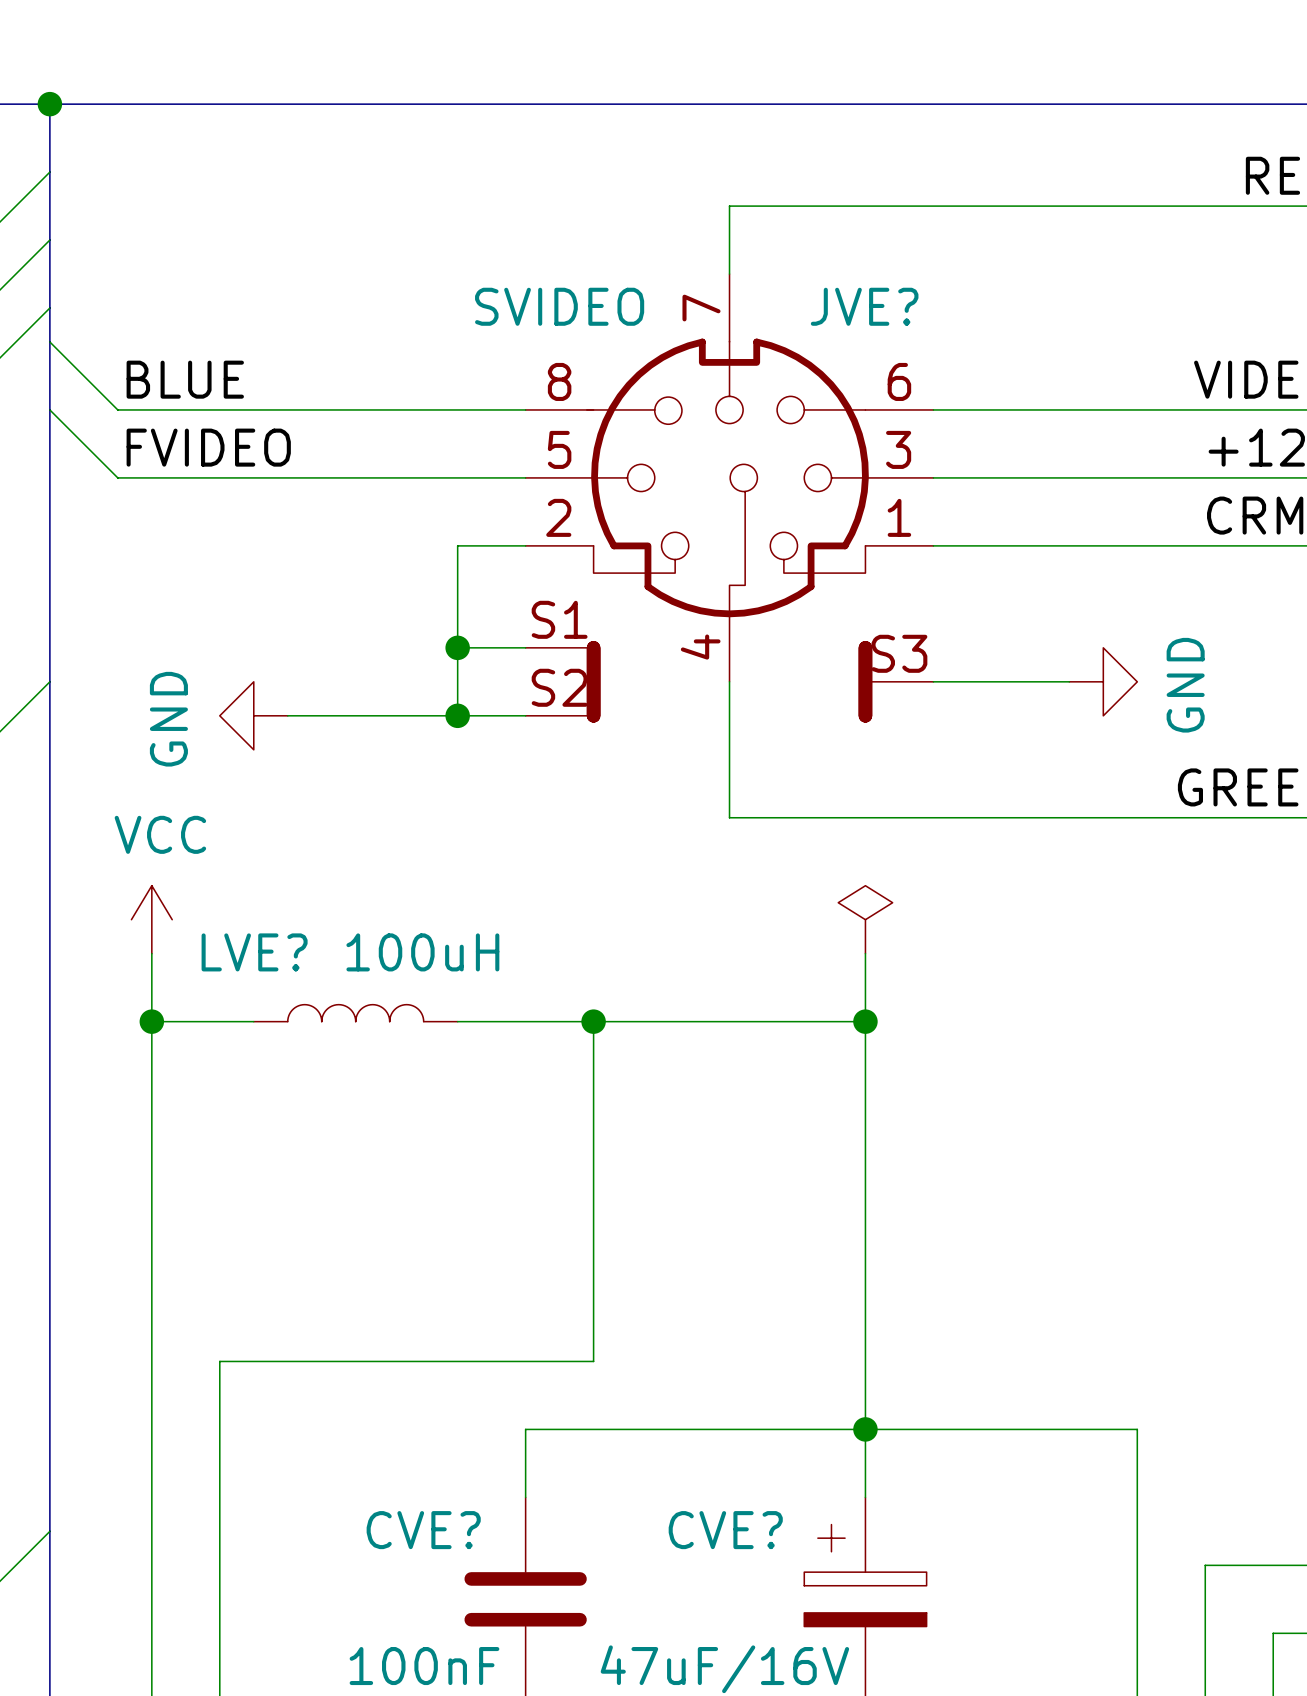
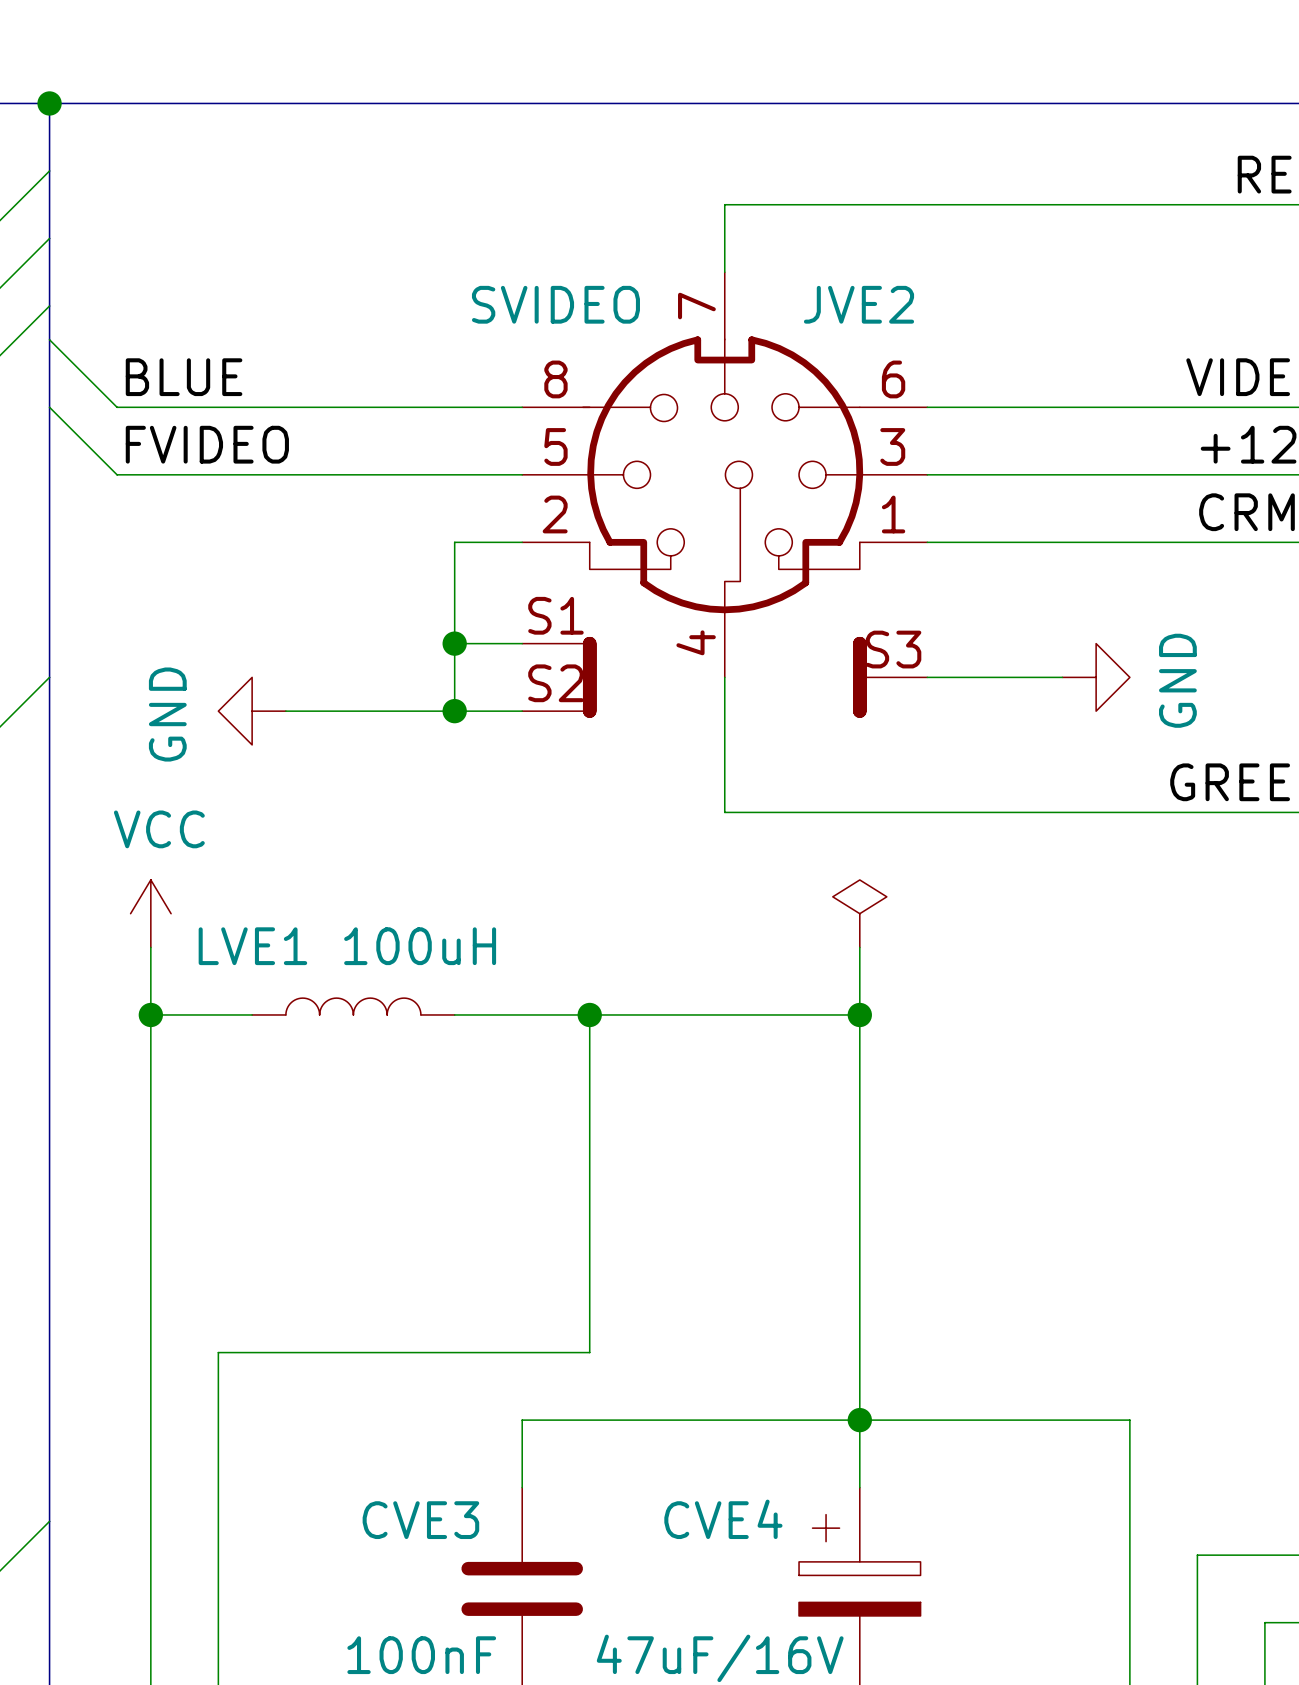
JVE? name: JVE? (864, 306) -> JVE2 (859, 304)
LVE? name: LVE? (254, 952) -> LVE1 (252, 946)
CVE? name: CVE? (423, 1530) -> CVE3 (420, 1520)
CVE? name: CVE? (725, 1530) -> CVE4 (723, 1519)

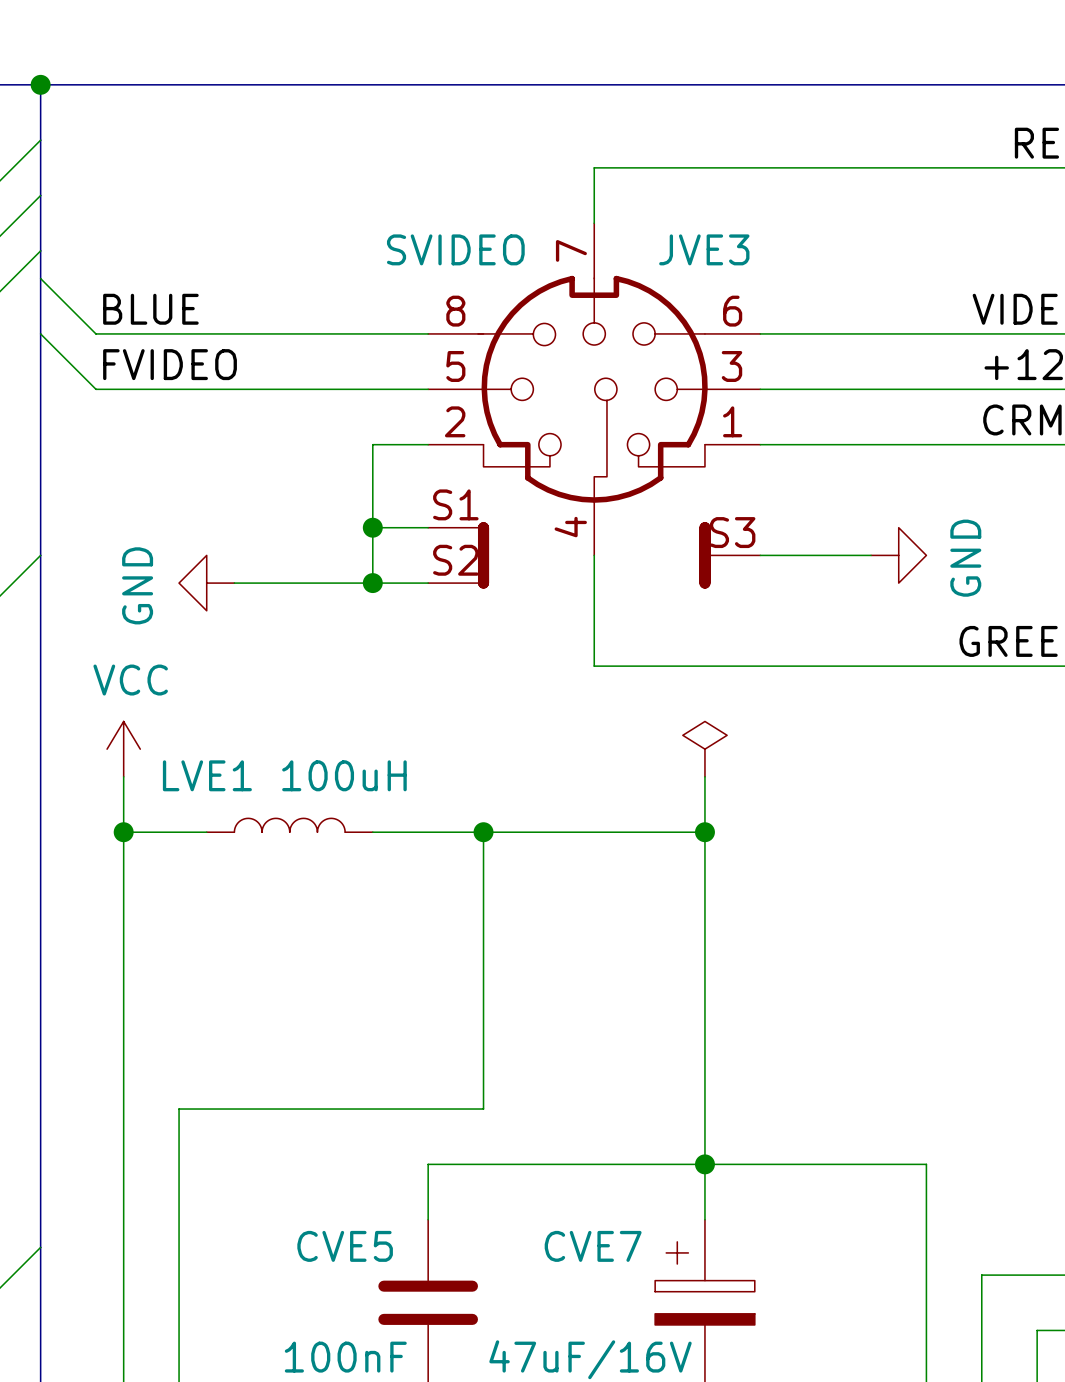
JVE2 name: JVE2 (859, 304) -> JVE3 (704, 249)
CVE4 name: CVE4 (723, 1519) -> CVE7 (593, 1246)
CVE3 name: CVE3 (420, 1520) -> CVE5 (345, 1246)

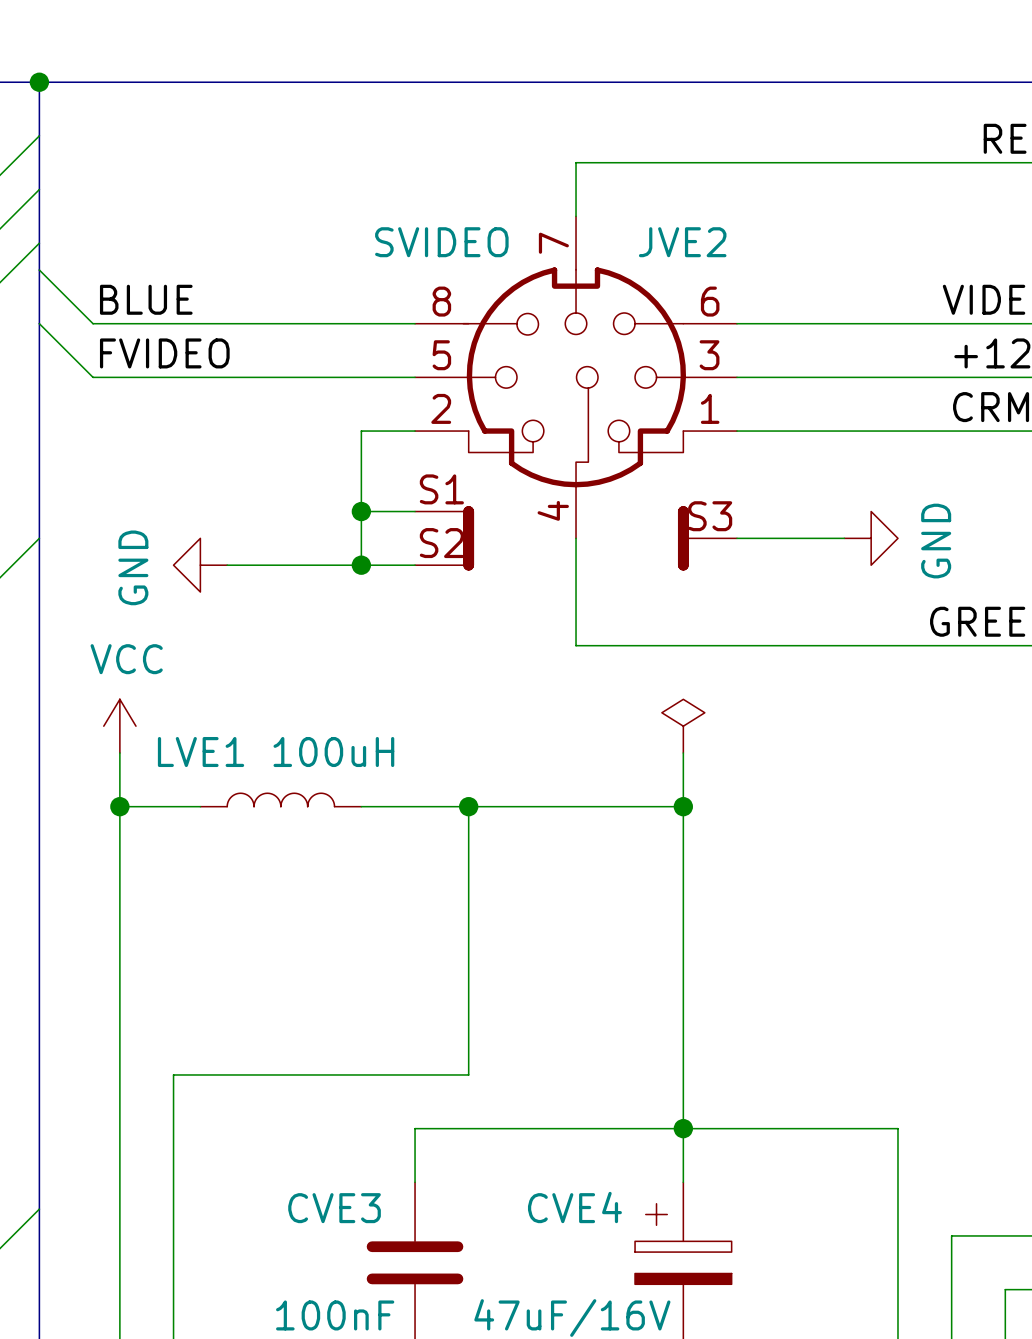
JVE3 name: JVE3 (704, 249) -> JVE2 (682, 242)
CVE5 name: CVE5 (345, 1246) -> CVE3 (334, 1208)
CVE7 name: CVE7 (593, 1246) -> CVE4 (574, 1207)

